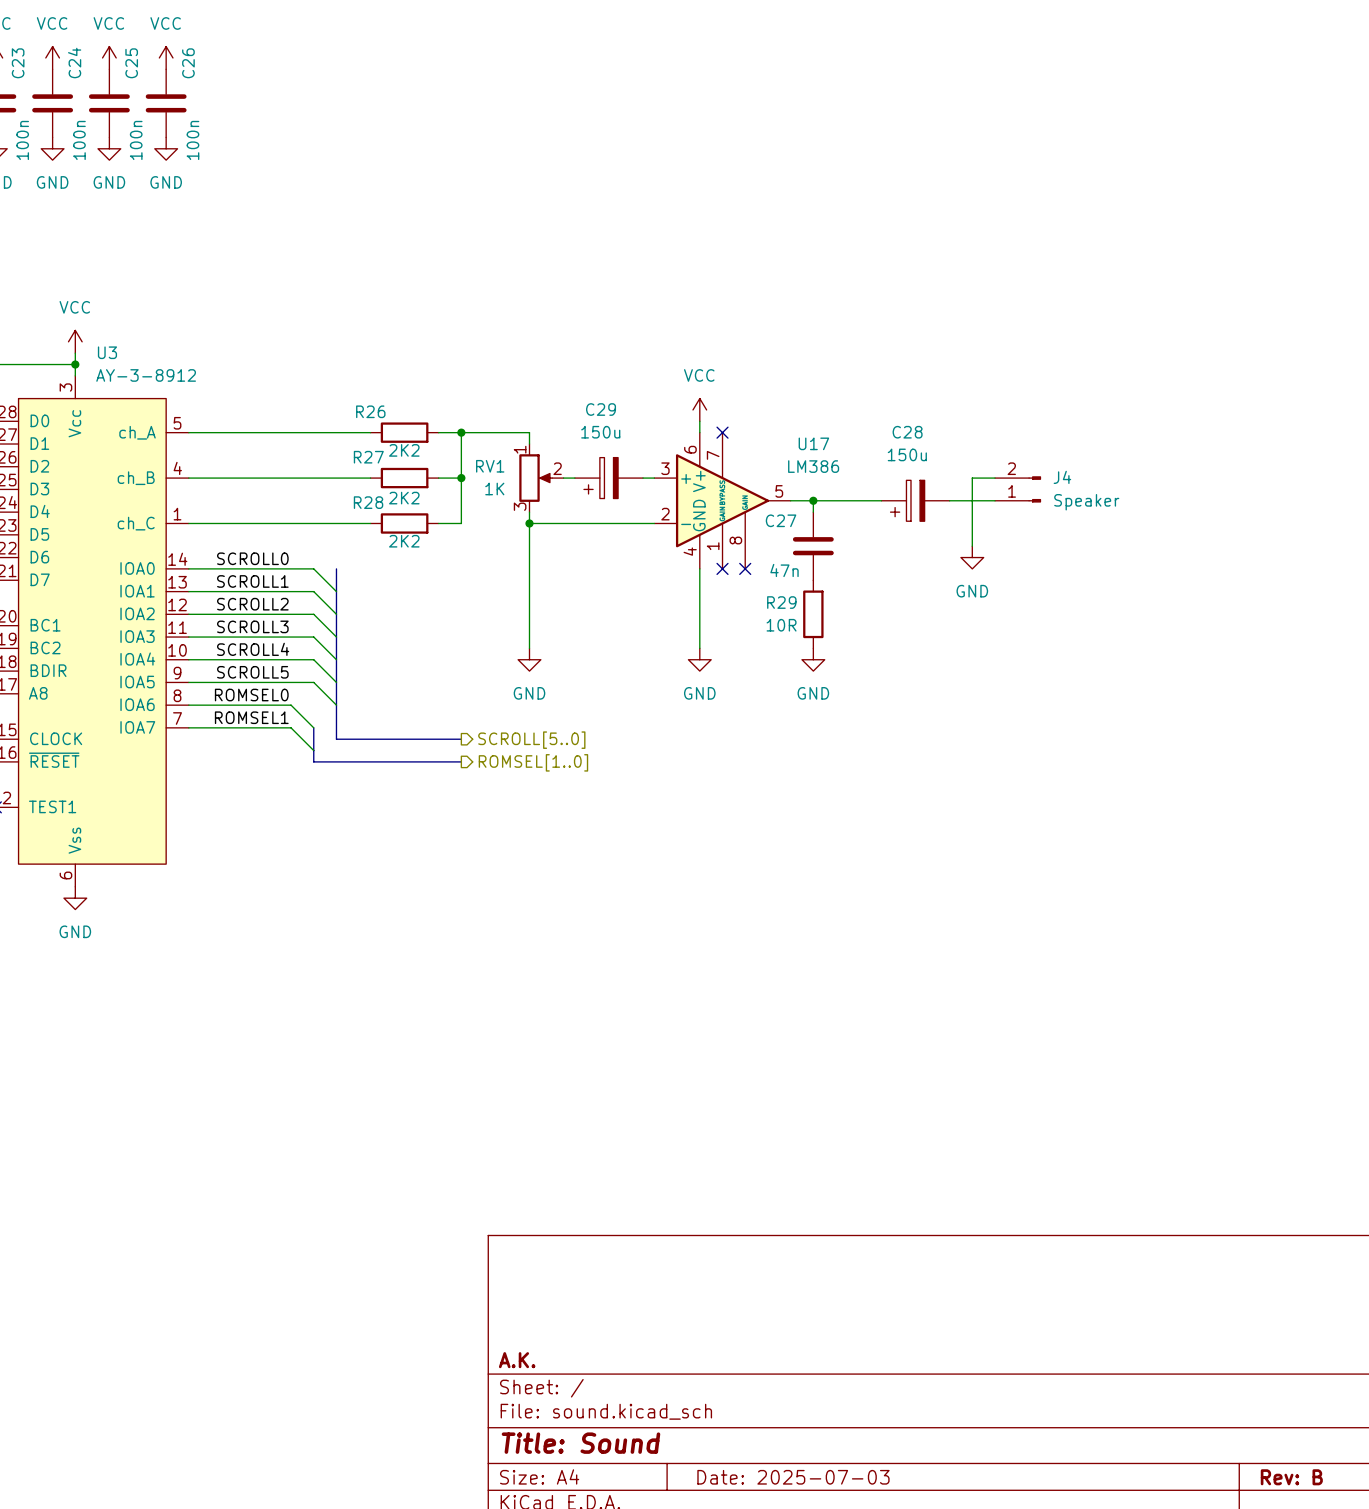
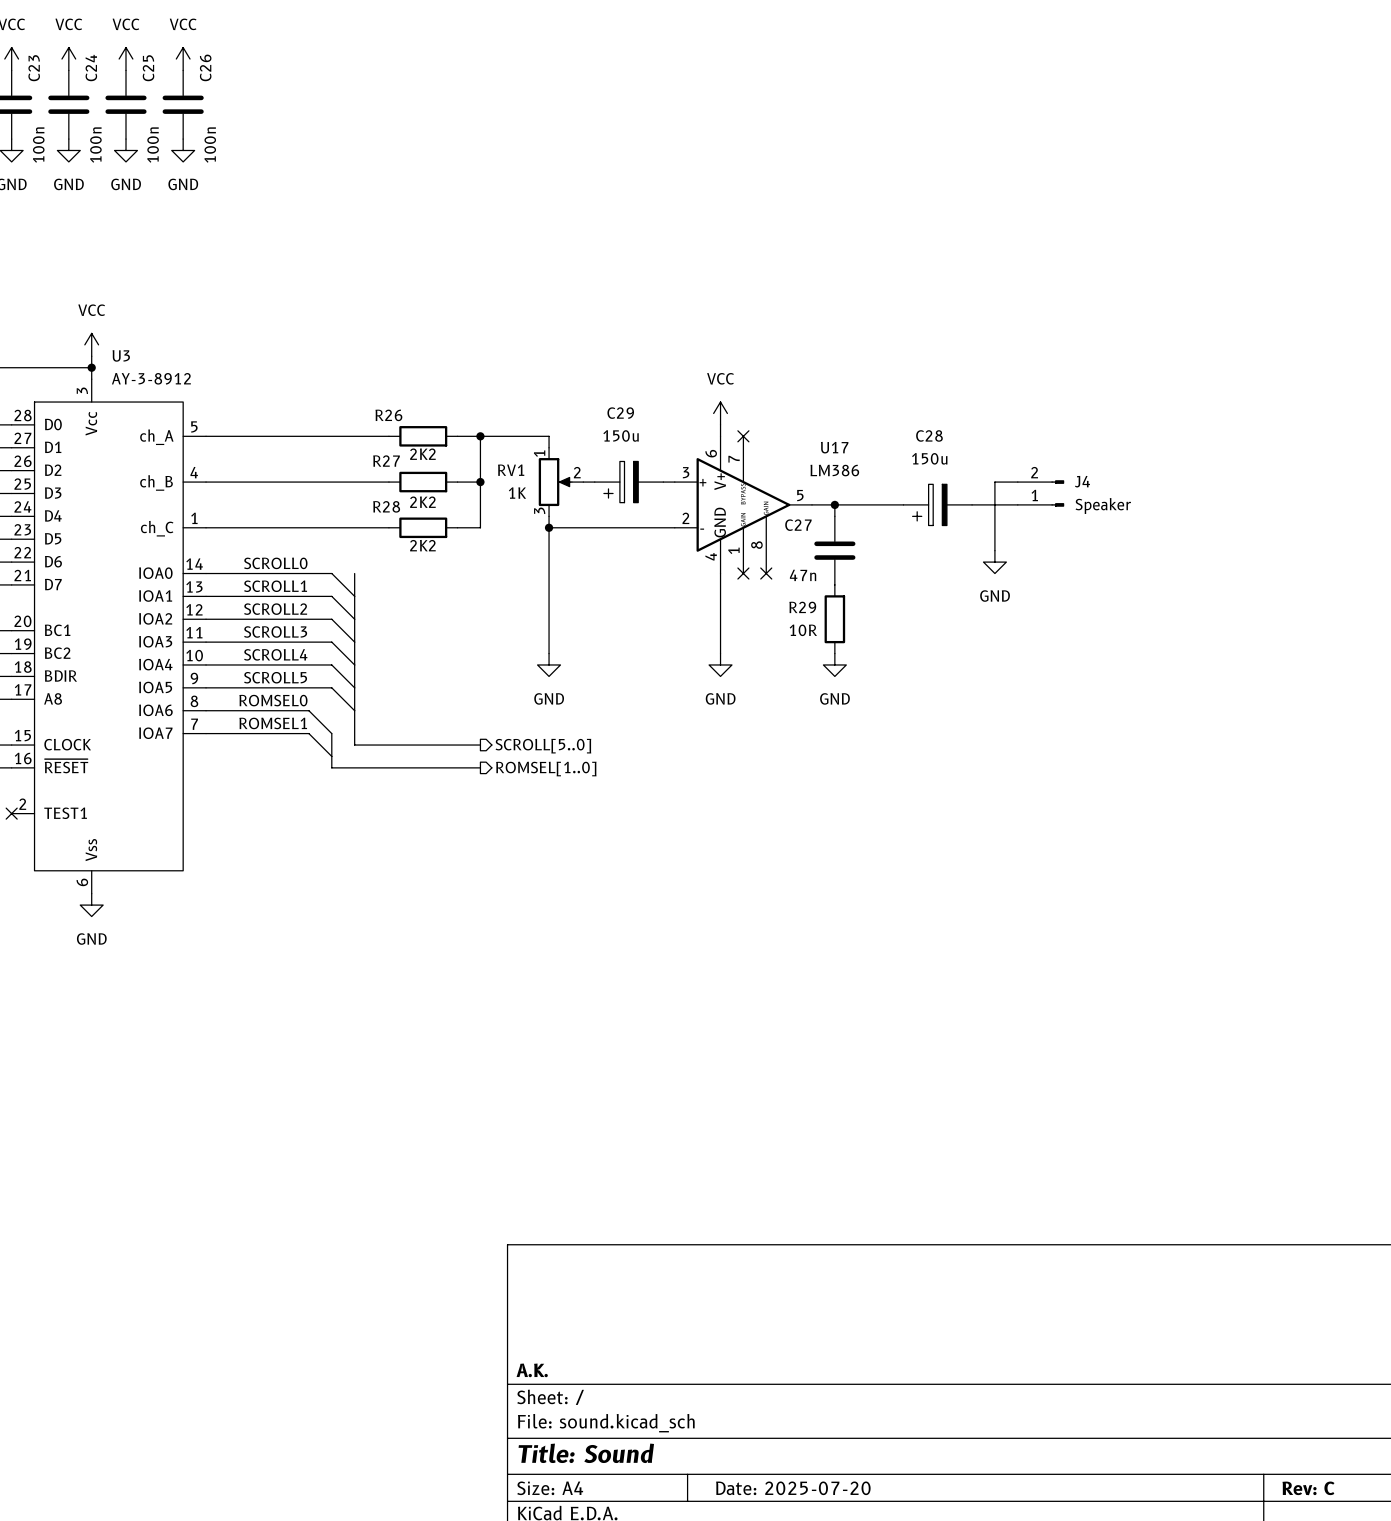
title block: Date: 2025-07-03 (793, 1477) -> Date: 2025-07-20 (793, 1488)
title block: Rev: B (1291, 1477) -> Rev: C (1308, 1488)

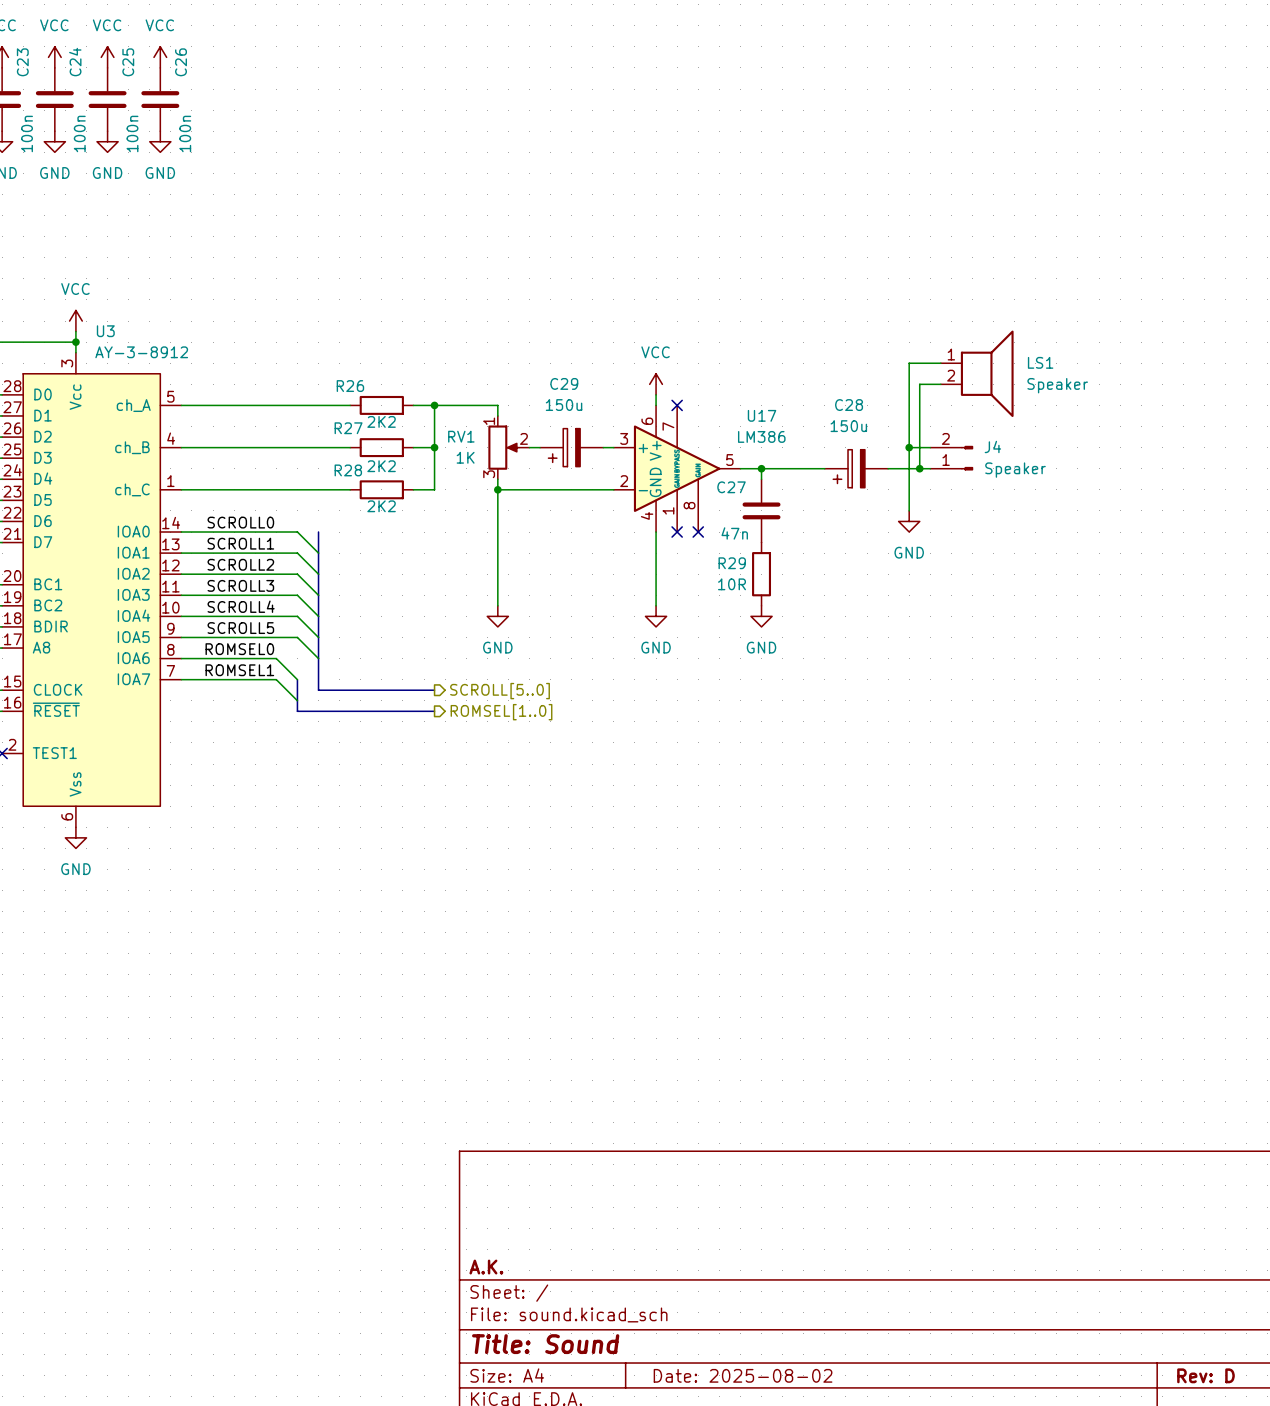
wire: none -> (940, 363) (909, 363) (909, 447)
LS1: none -> Speaker (977, 373)
wire: none -> (940, 384) (919, 384) (919, 468)
junction: none -> (909, 447)
junction: none -> (919, 468)
title block: Date: 2025-07-20 (793, 1488) -> Date: 2025-08-02 (743, 1375)
title block: Rev: C (1308, 1488) -> Rev: D (1205, 1375)

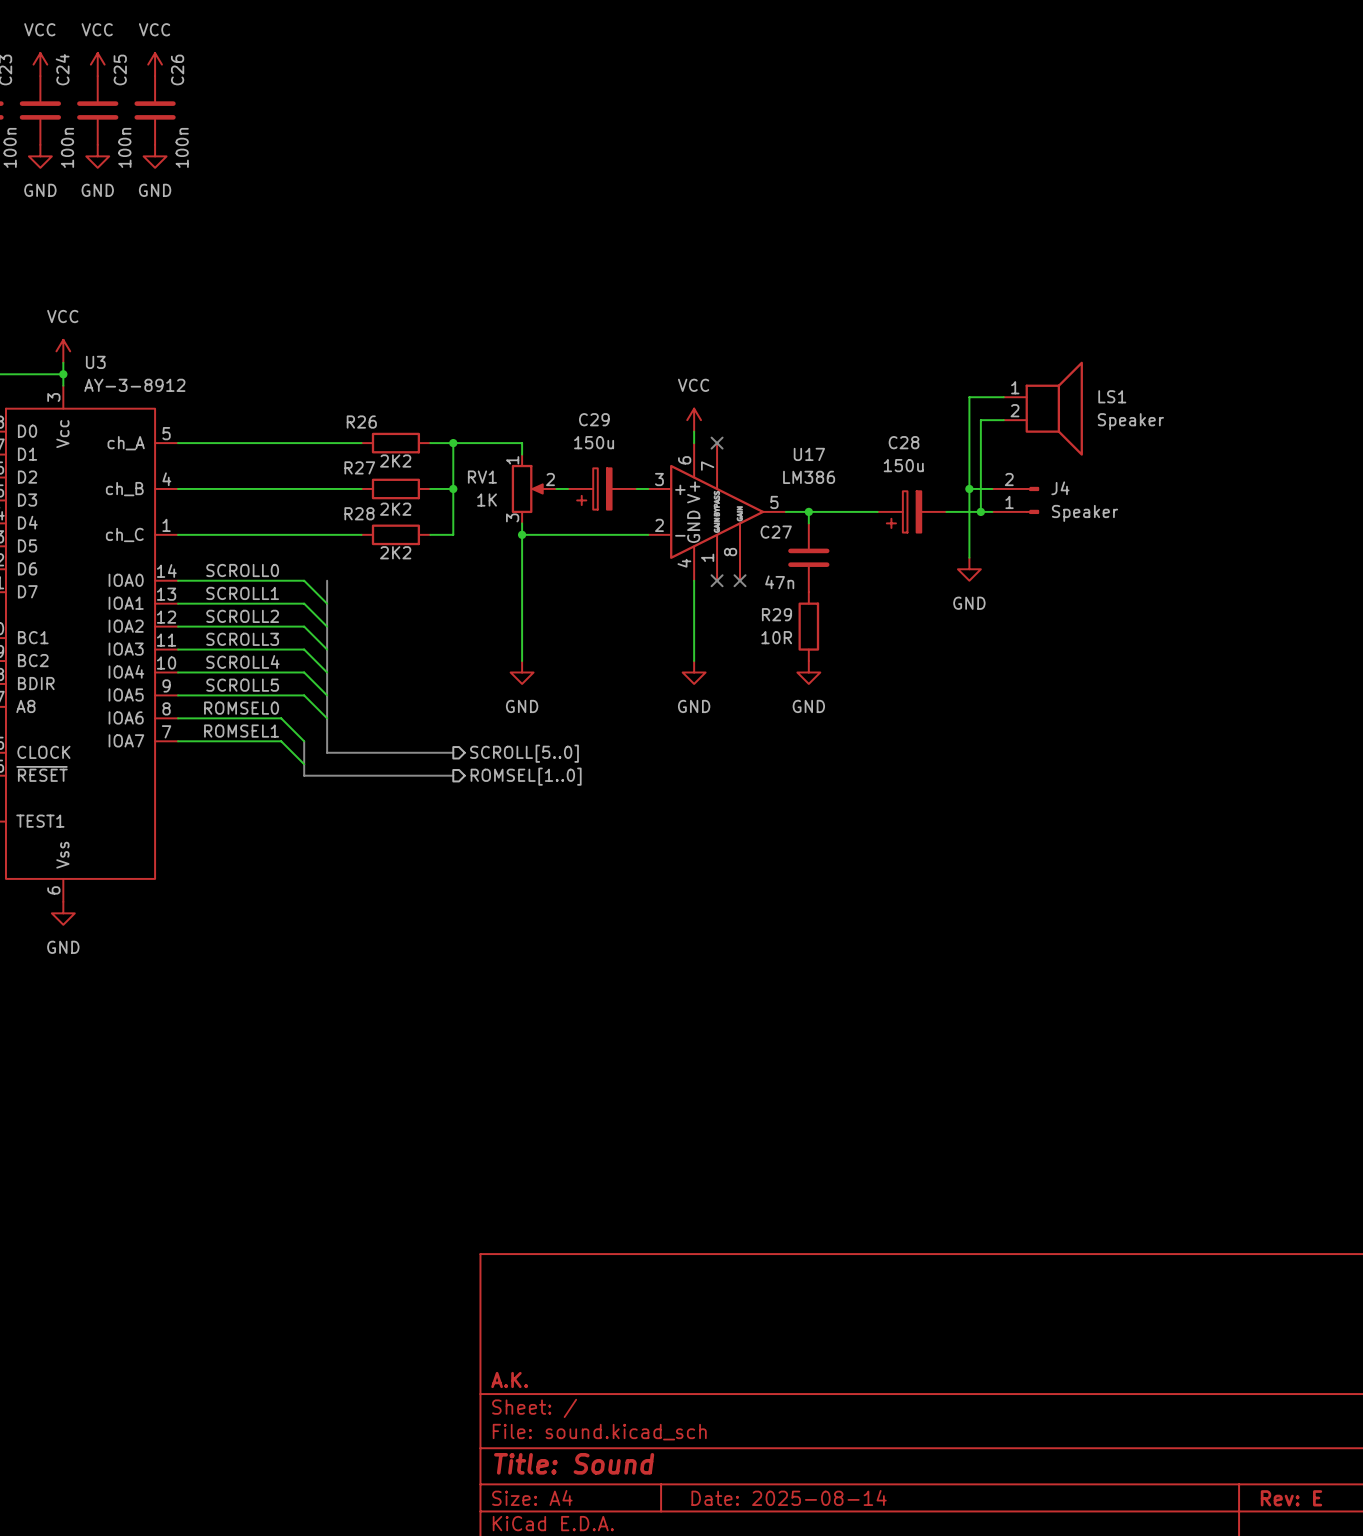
title block: Date: 2025-08-02 (743, 1375) -> Date: 2025-08-14 (789, 1497)
title block: Rev: D (1205, 1375) -> Rev: E (1291, 1498)

